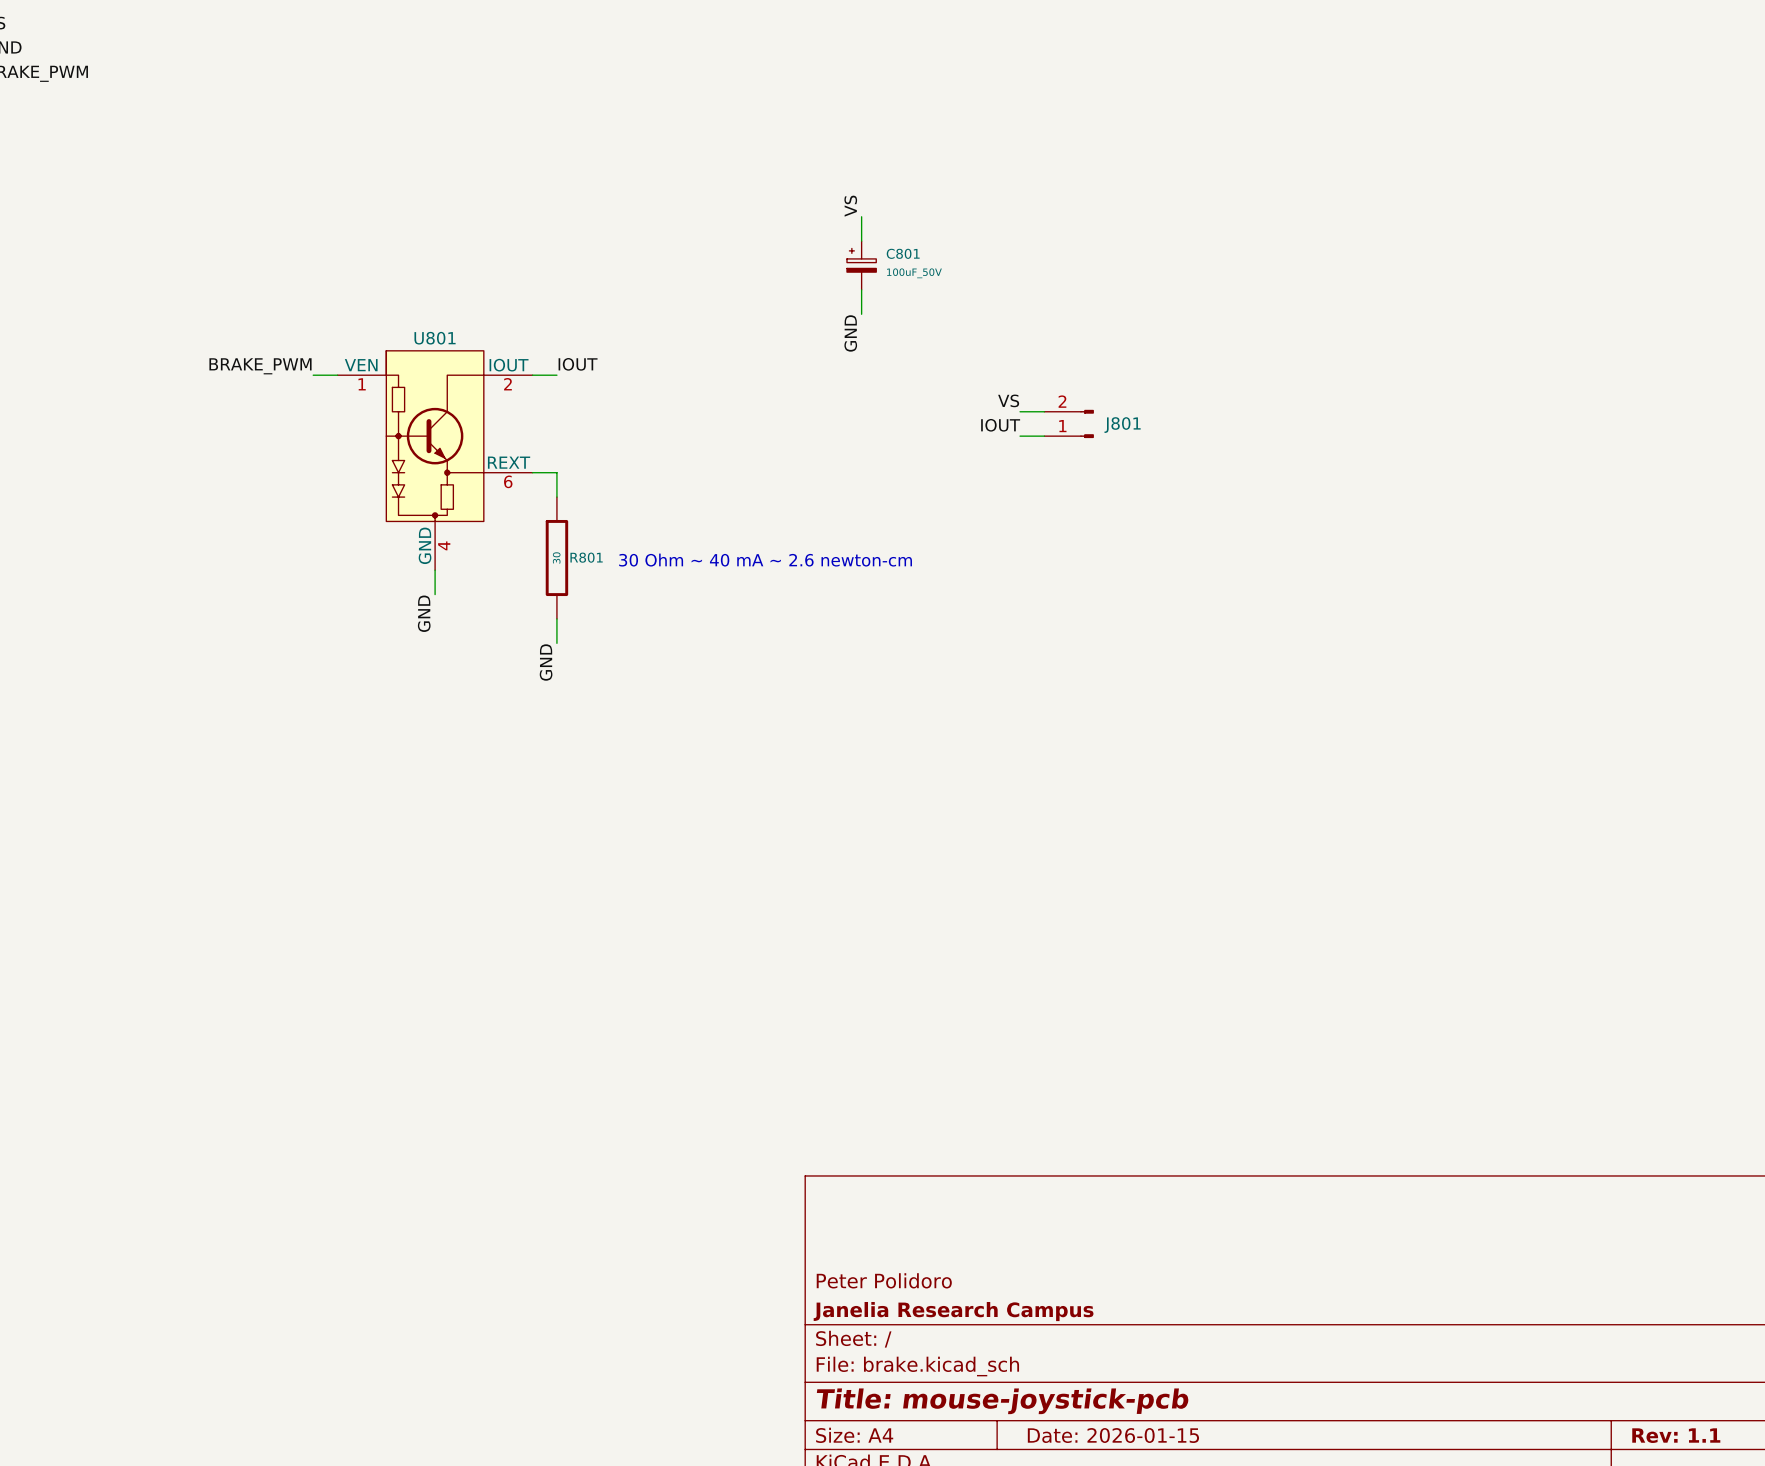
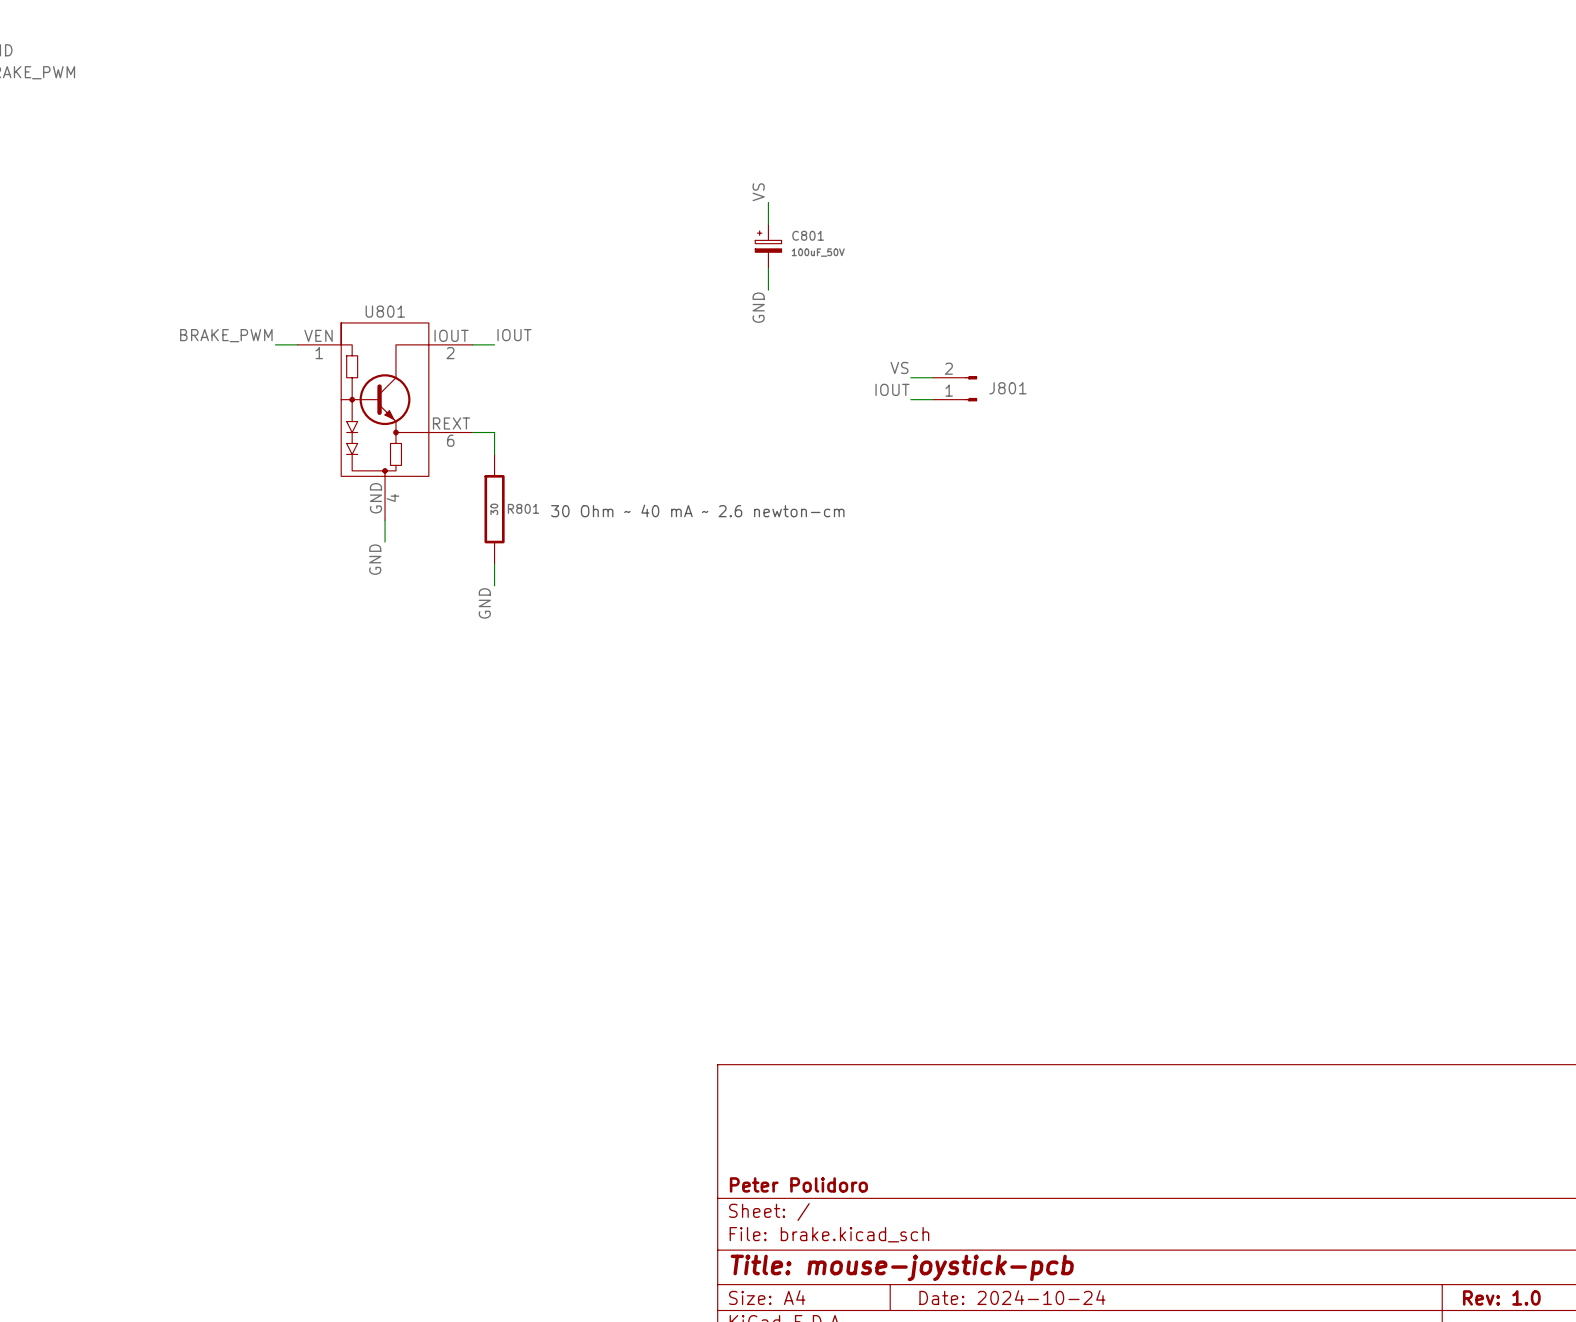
title block: Peter Polidoro (884, 1280) -> none
title block: Janelia Research Campus (953, 1311) -> Peter Polidoro (798, 1184)
title block: Date: 2026-01-15 (1113, 1435) -> Date: 2024-10-24 (1012, 1297)
title block: Rev: 1.1 (1676, 1435) -> Rev: 1.0 (1501, 1297)

